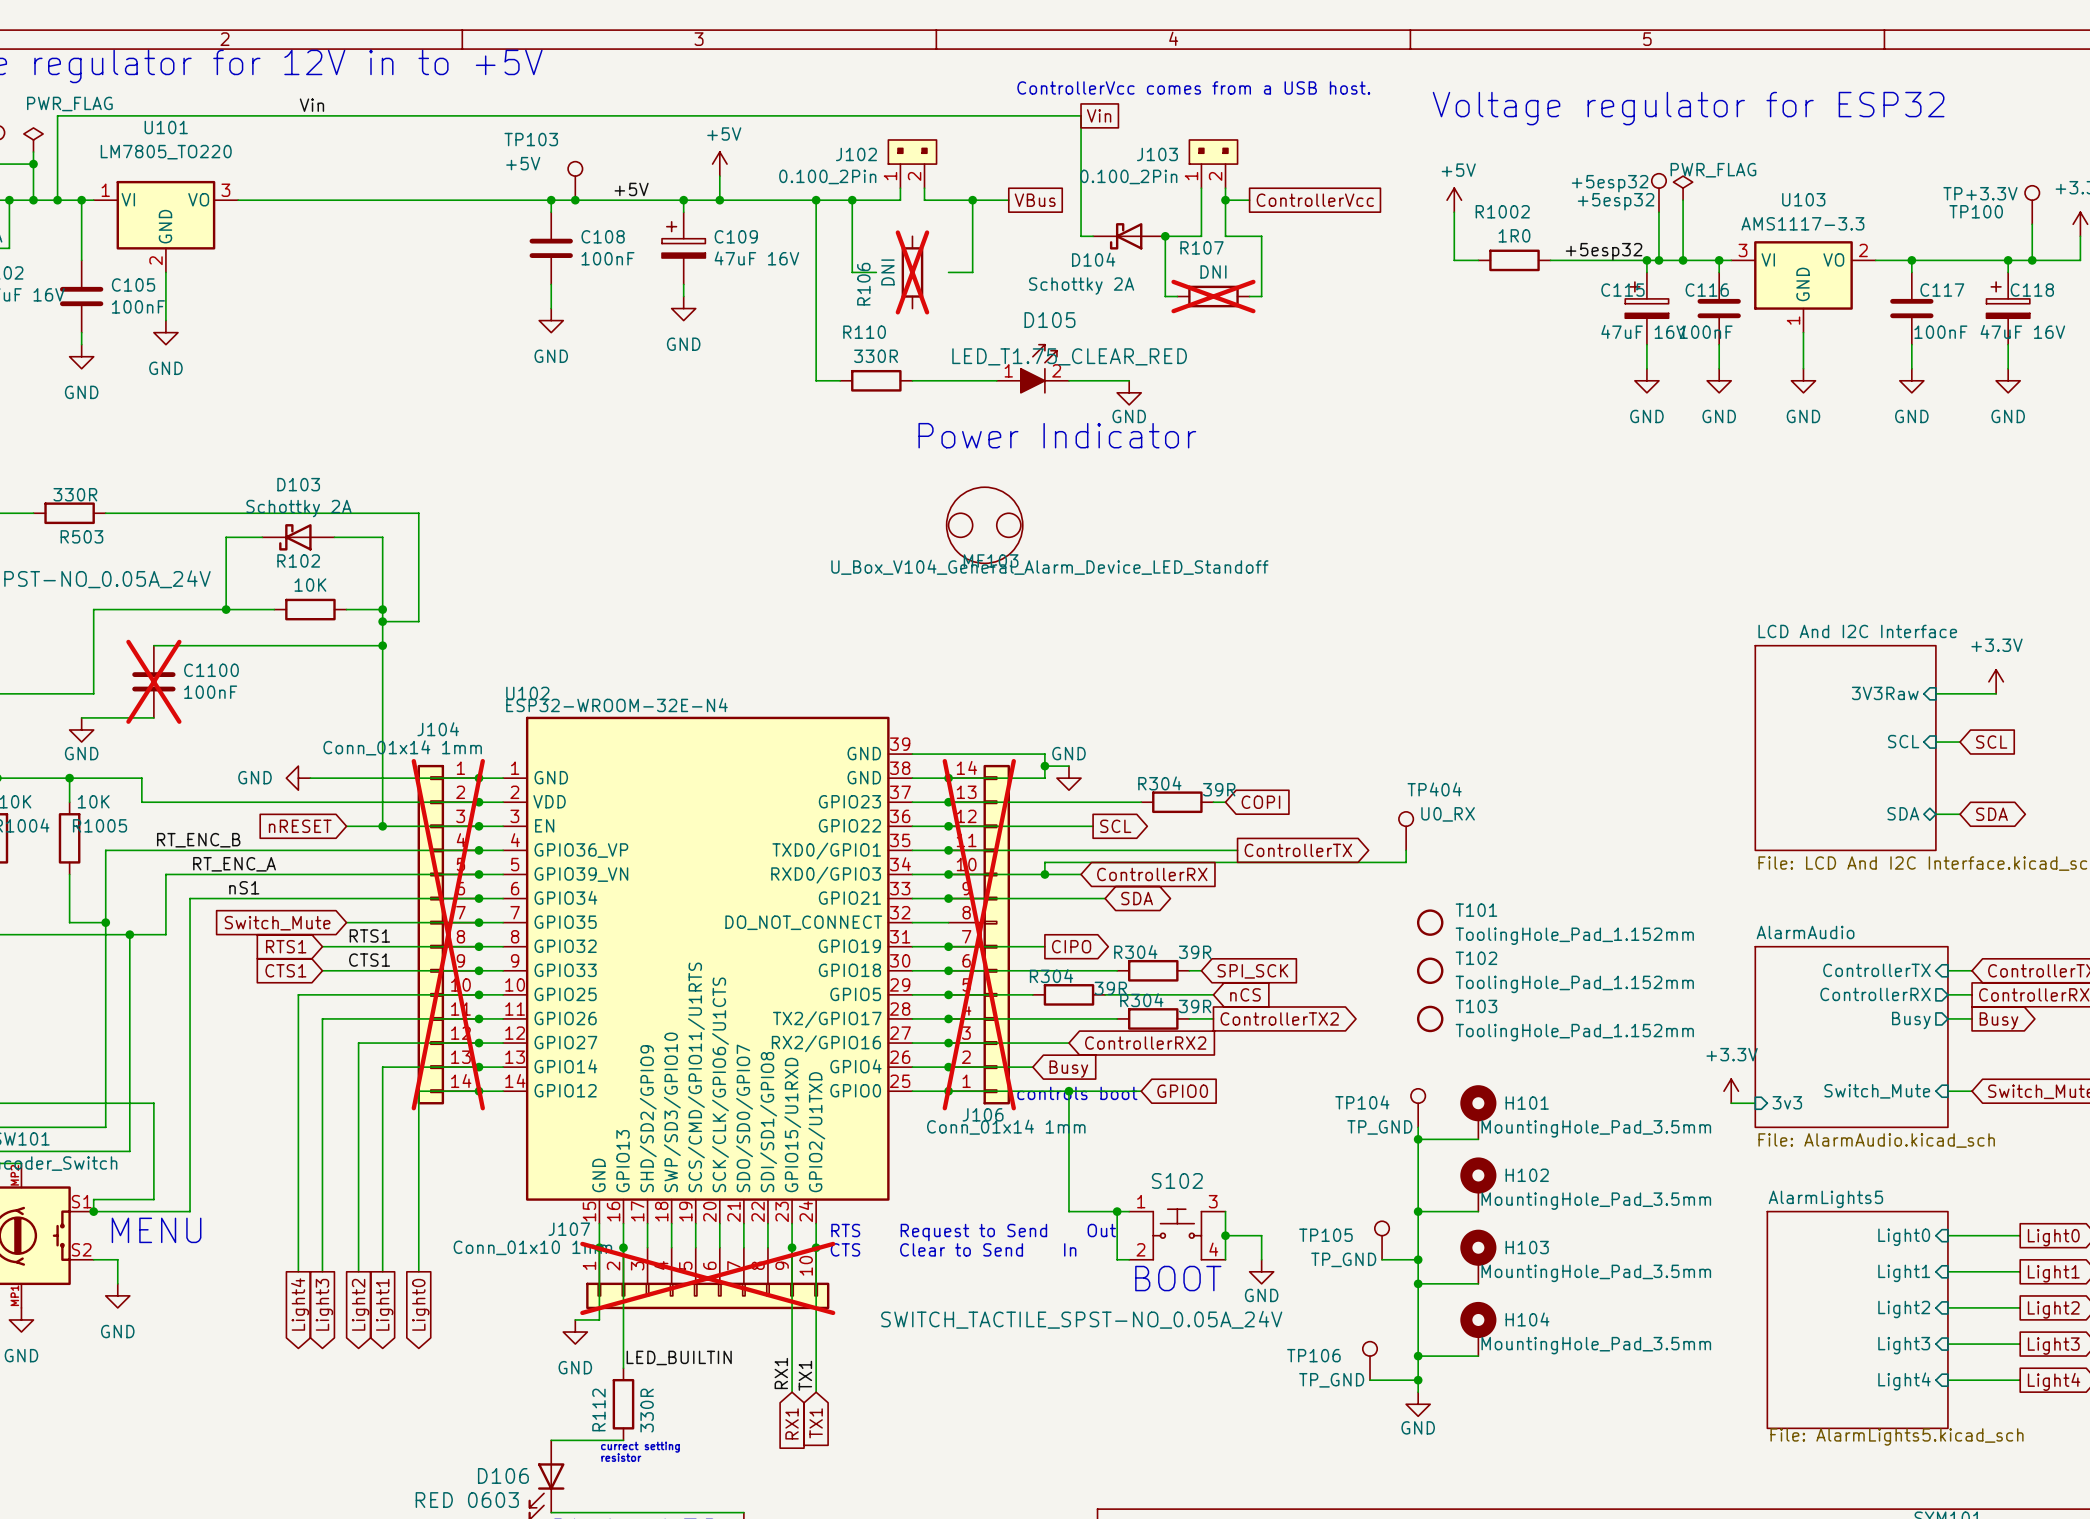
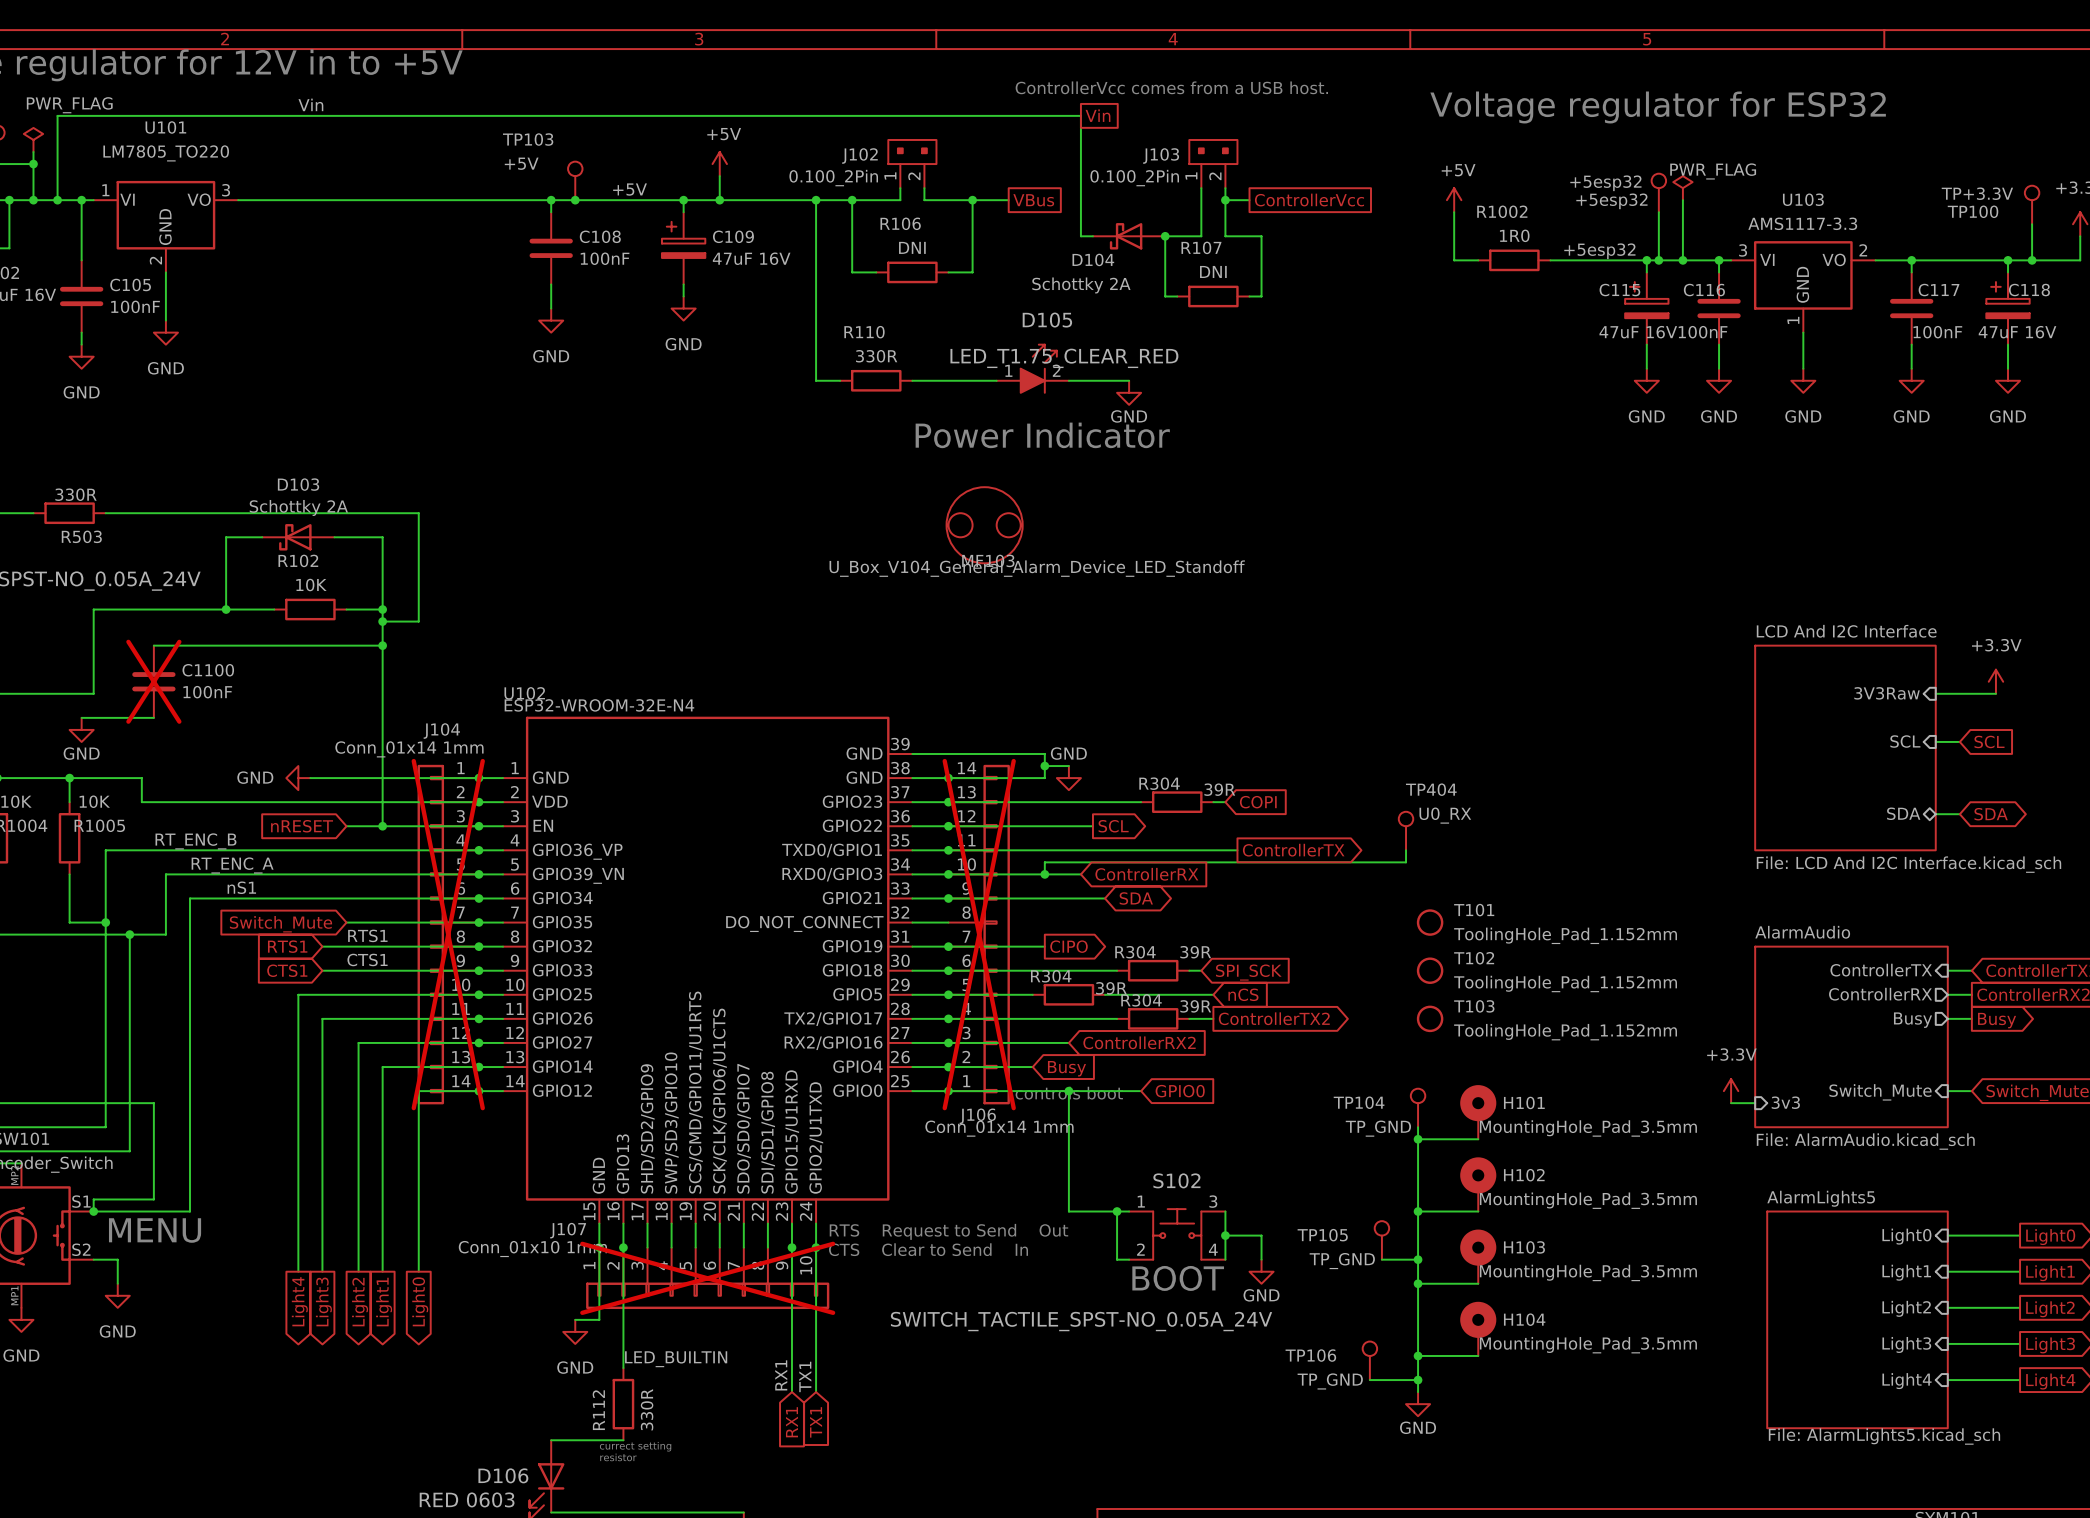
R106 rotation: 0° (912, 272) -> 90° clockwise (912, 272)
R106 do-not-place cross: (912, 272) -> none
R107 do-not-place cross: (1213, 296) -> none

